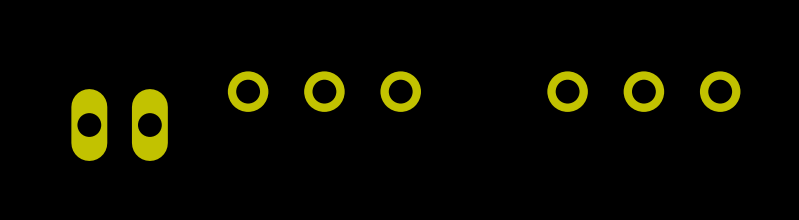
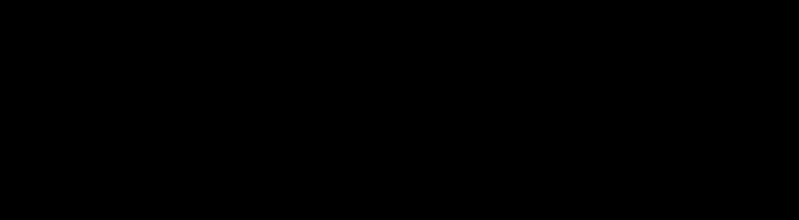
part: (324, 91) -> none
part: (643, 91) -> none
part: (119, 125) -> none

